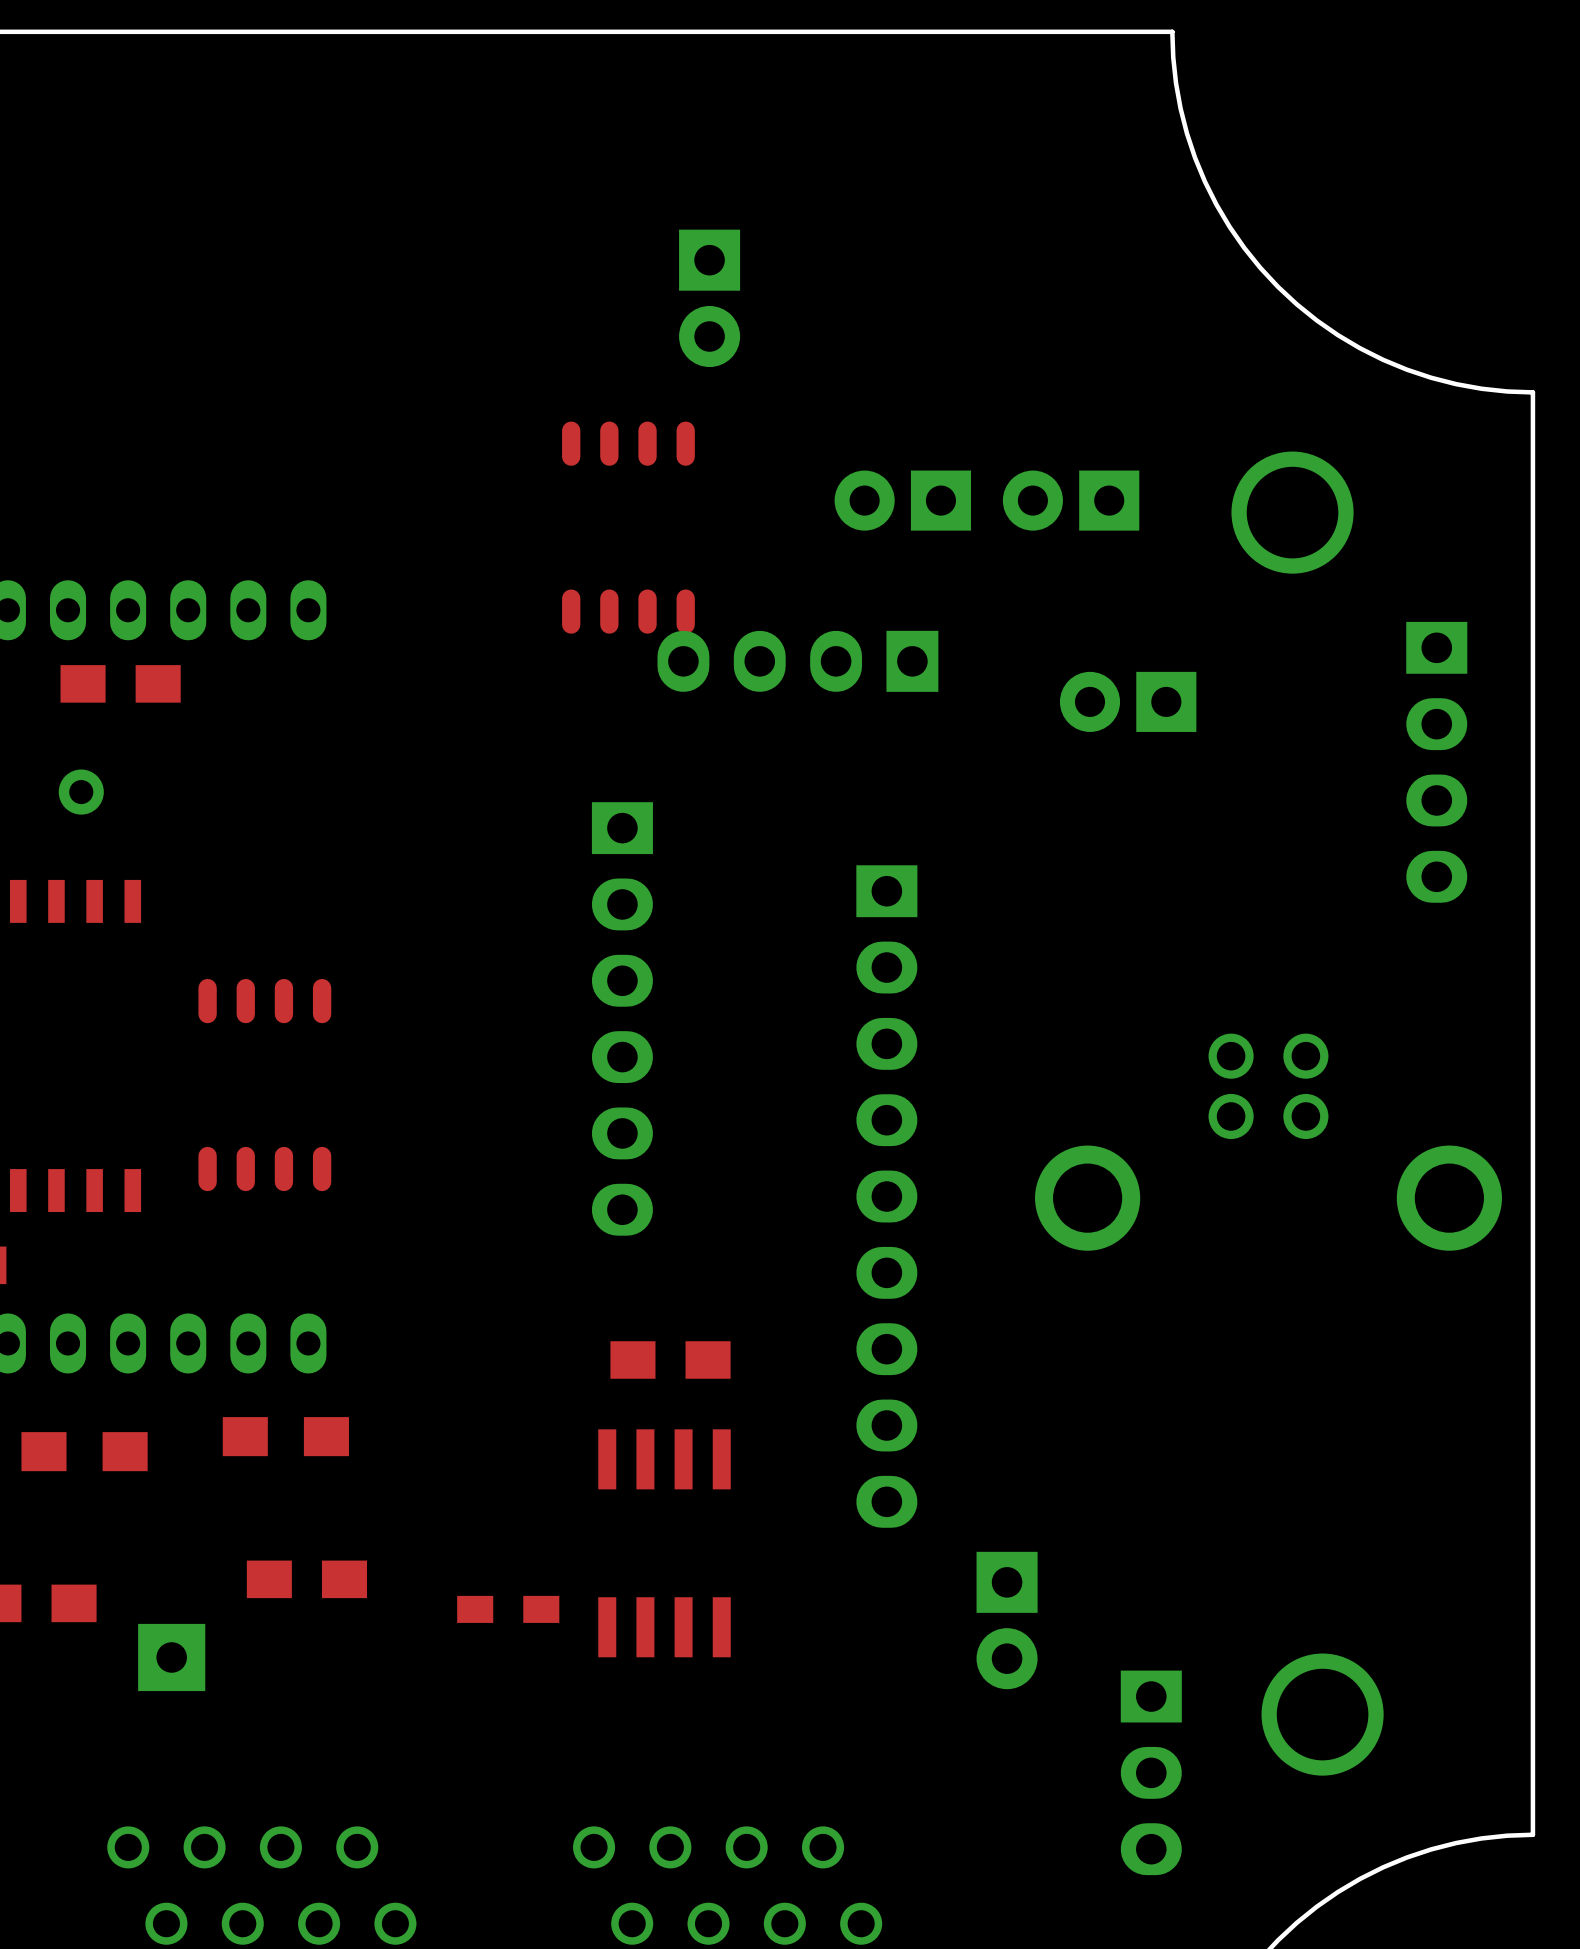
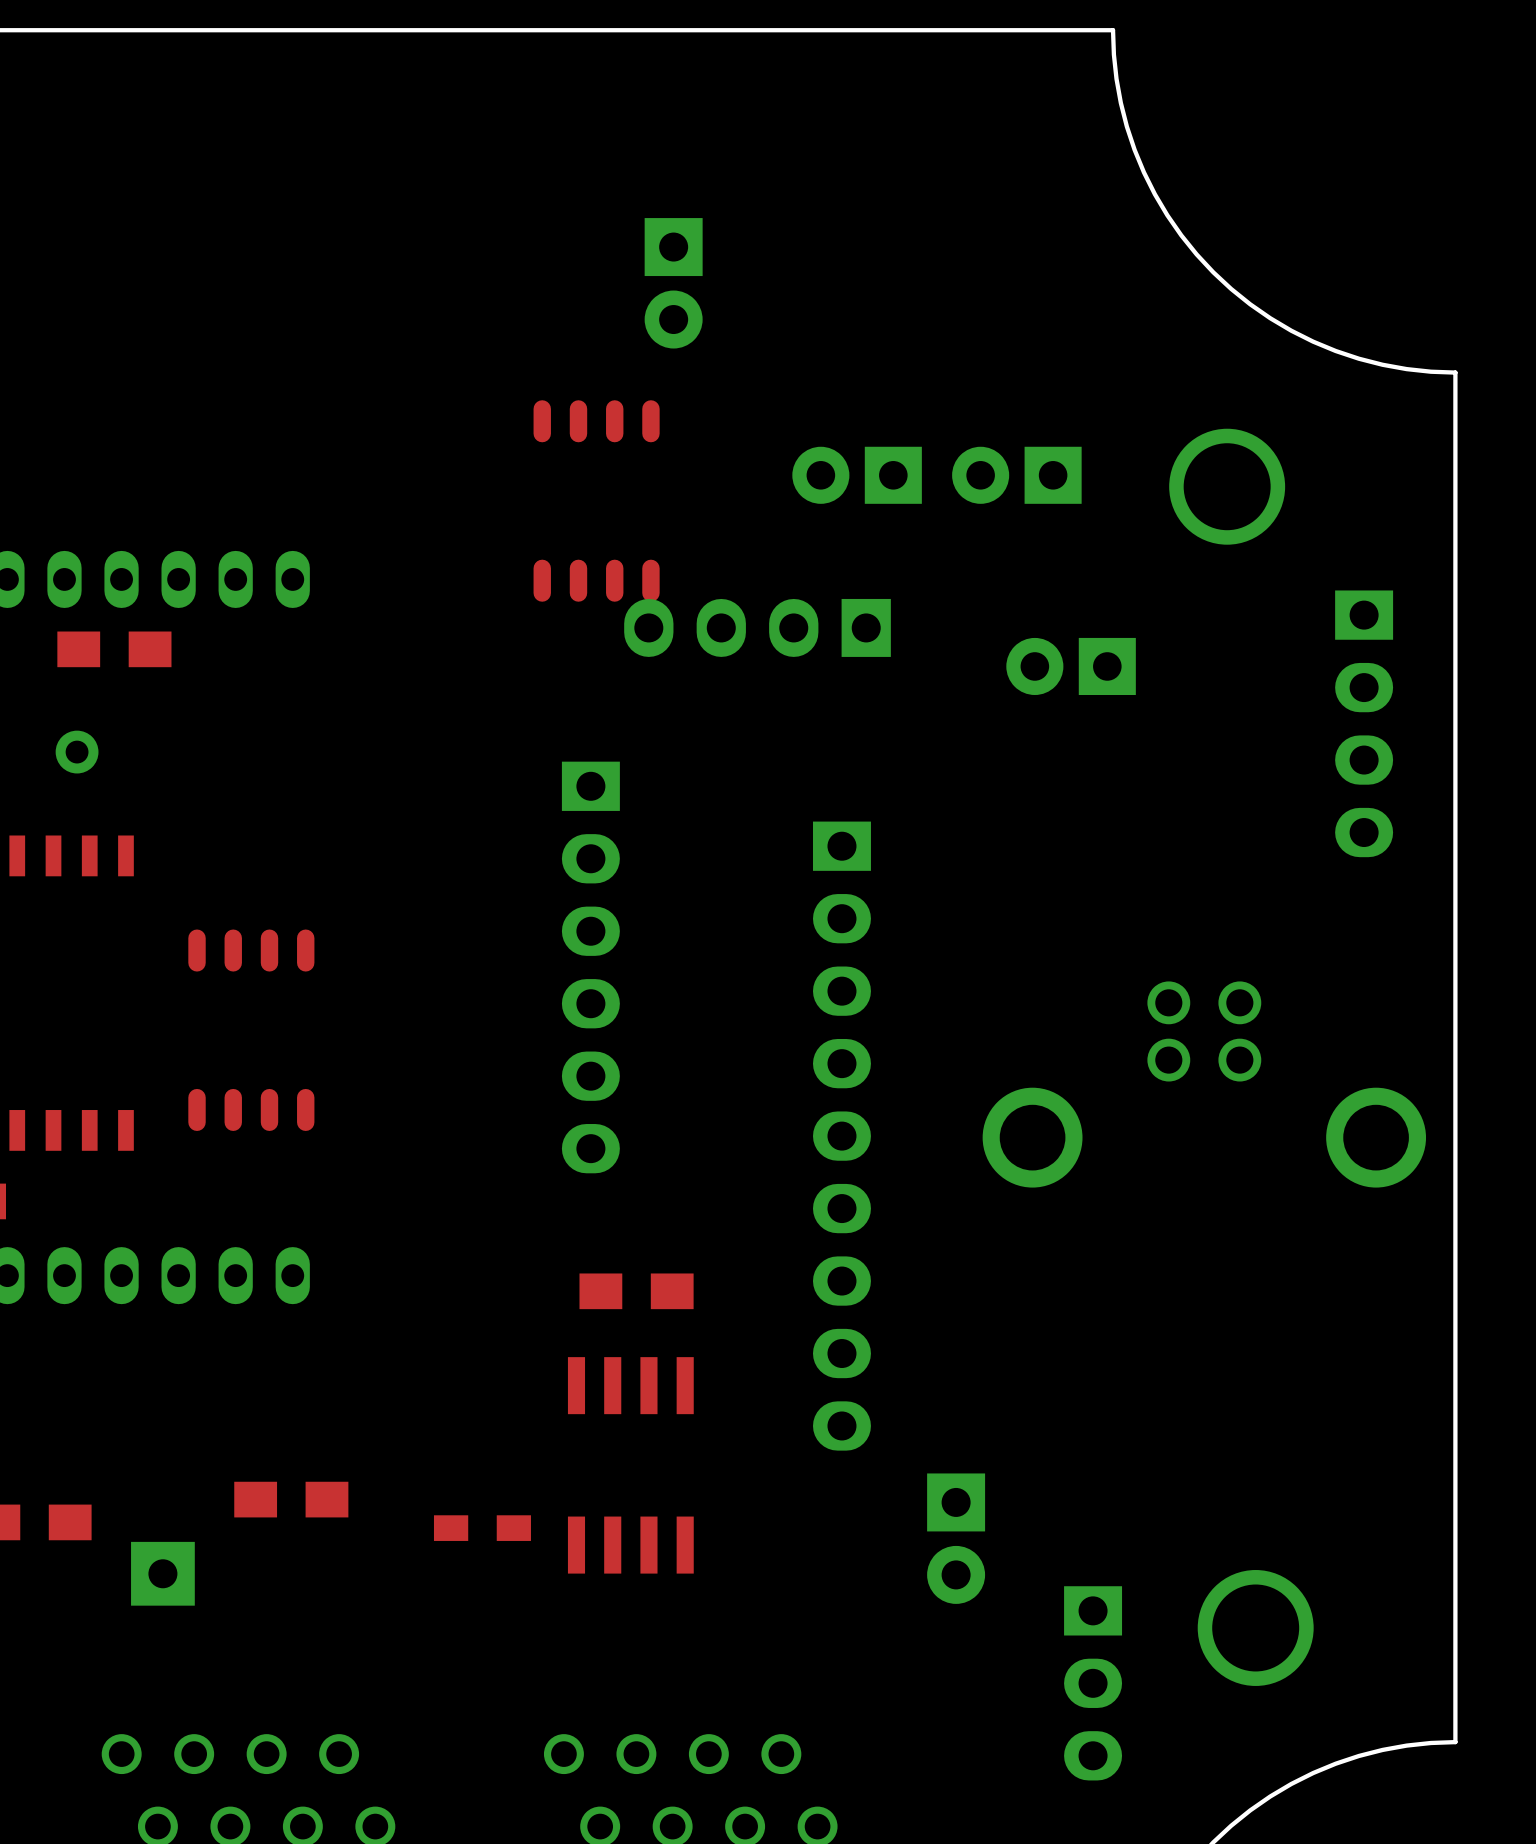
part: (285, 1436) -> none
part: (84, 1451) -> none

